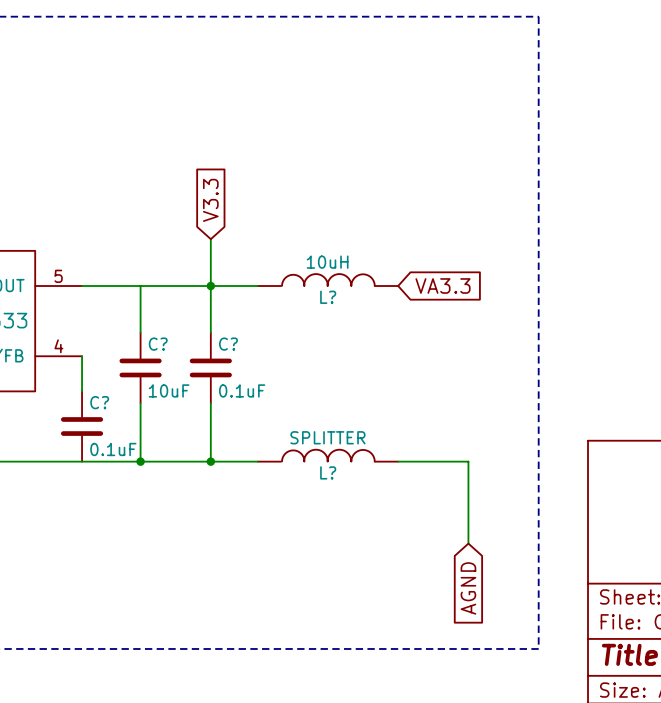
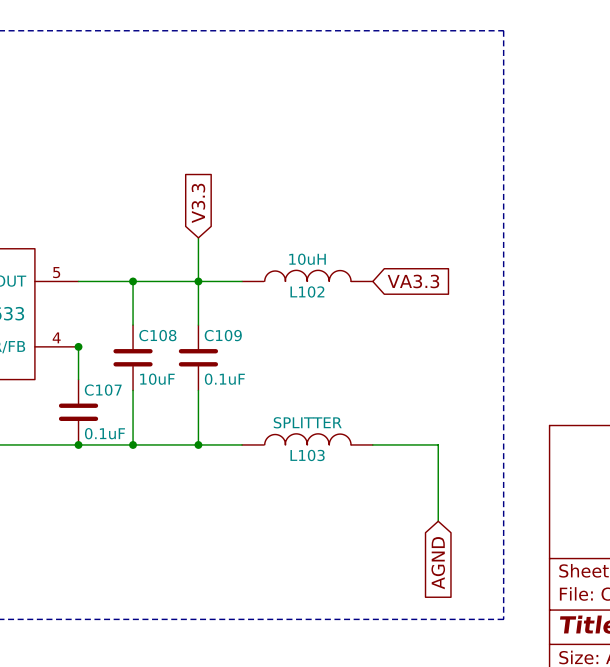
junction: none -> (133, 281)
L? name: L? (328, 297) -> L102 (307, 291)
C? name: C? (158, 344) -> C108 (157, 335)
C? name: C? (228, 344) -> C109 (223, 335)
junction: none -> (78, 346)
C? name: C? (99, 402) -> C107 (103, 390)
junction: none -> (78, 444)
L? name: L? (328, 472) -> L103 (307, 455)

